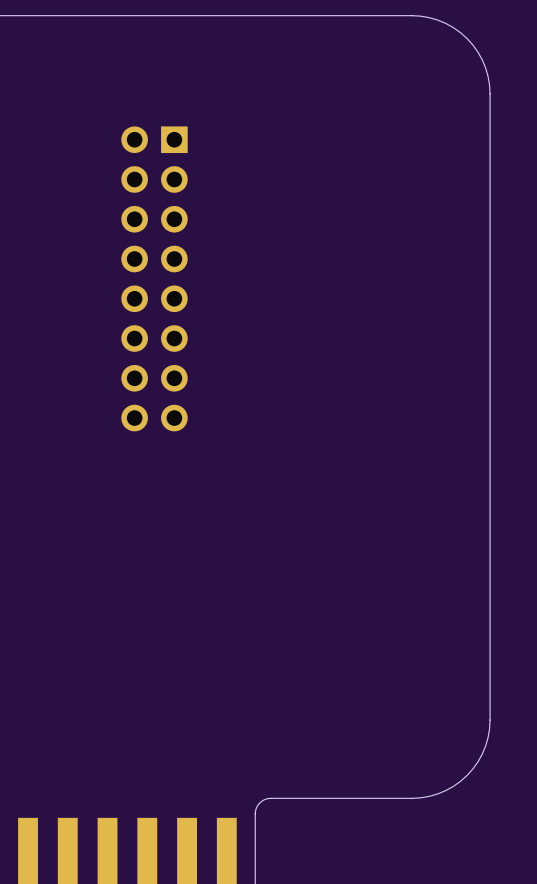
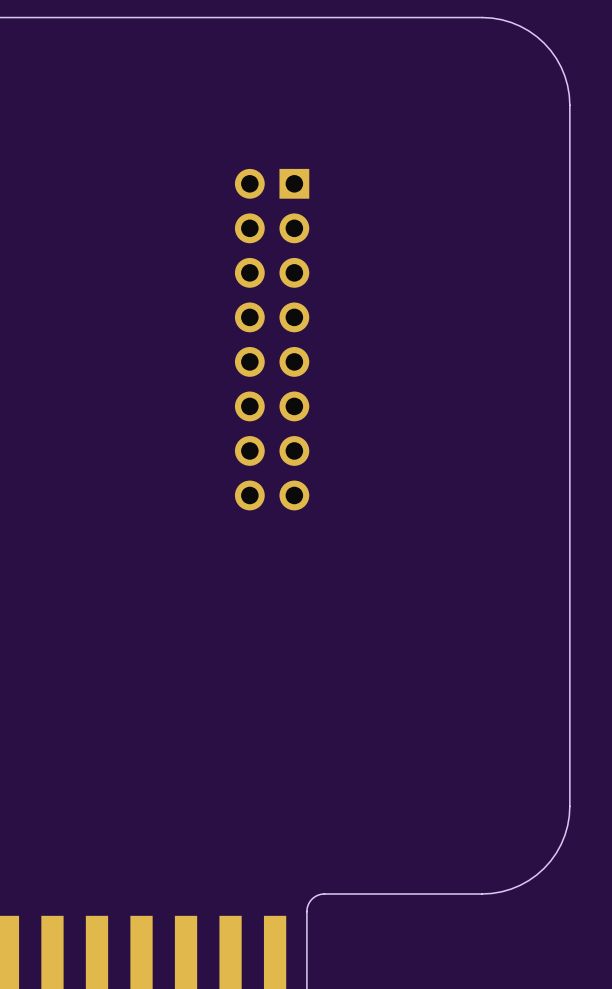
part position: (154, 278) -> (272, 339)

